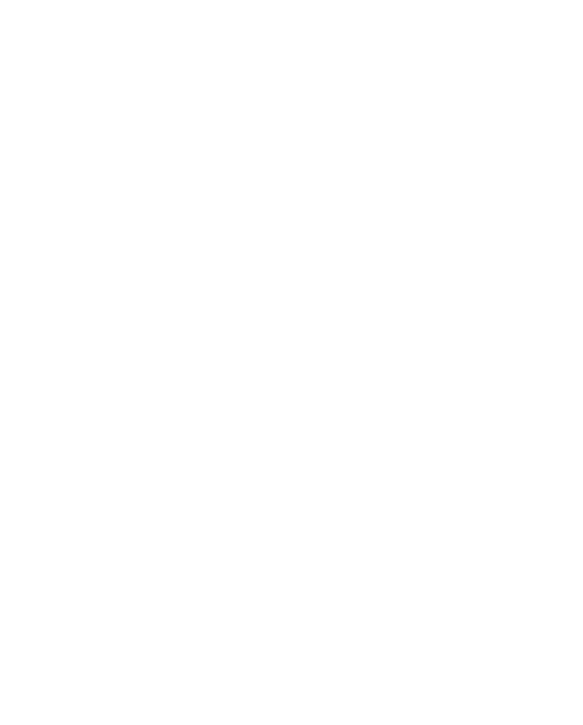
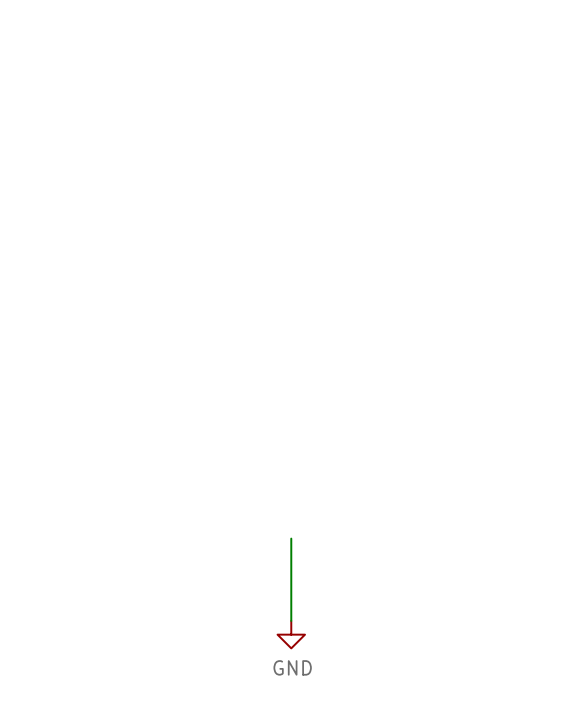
wire: none -> (291, 538) (291, 620)
power symbol: none -> GND (291, 634)

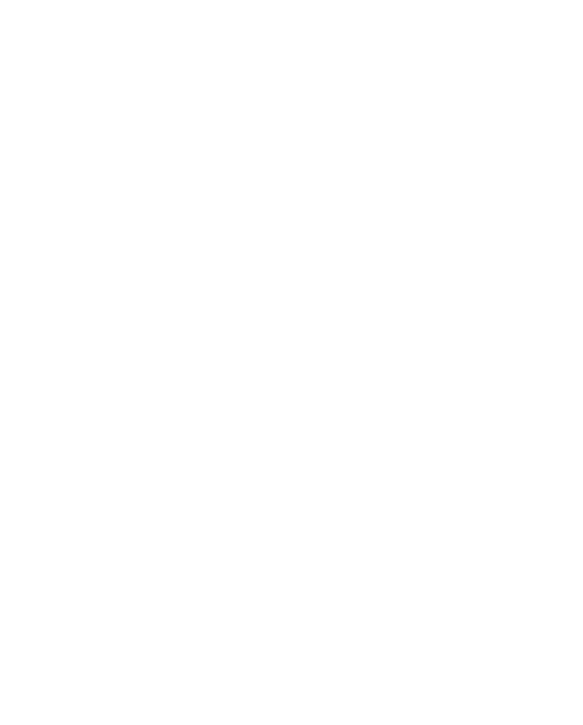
wire: (291, 538) (291, 620) -> none
power symbol: GND (291, 634) -> none

